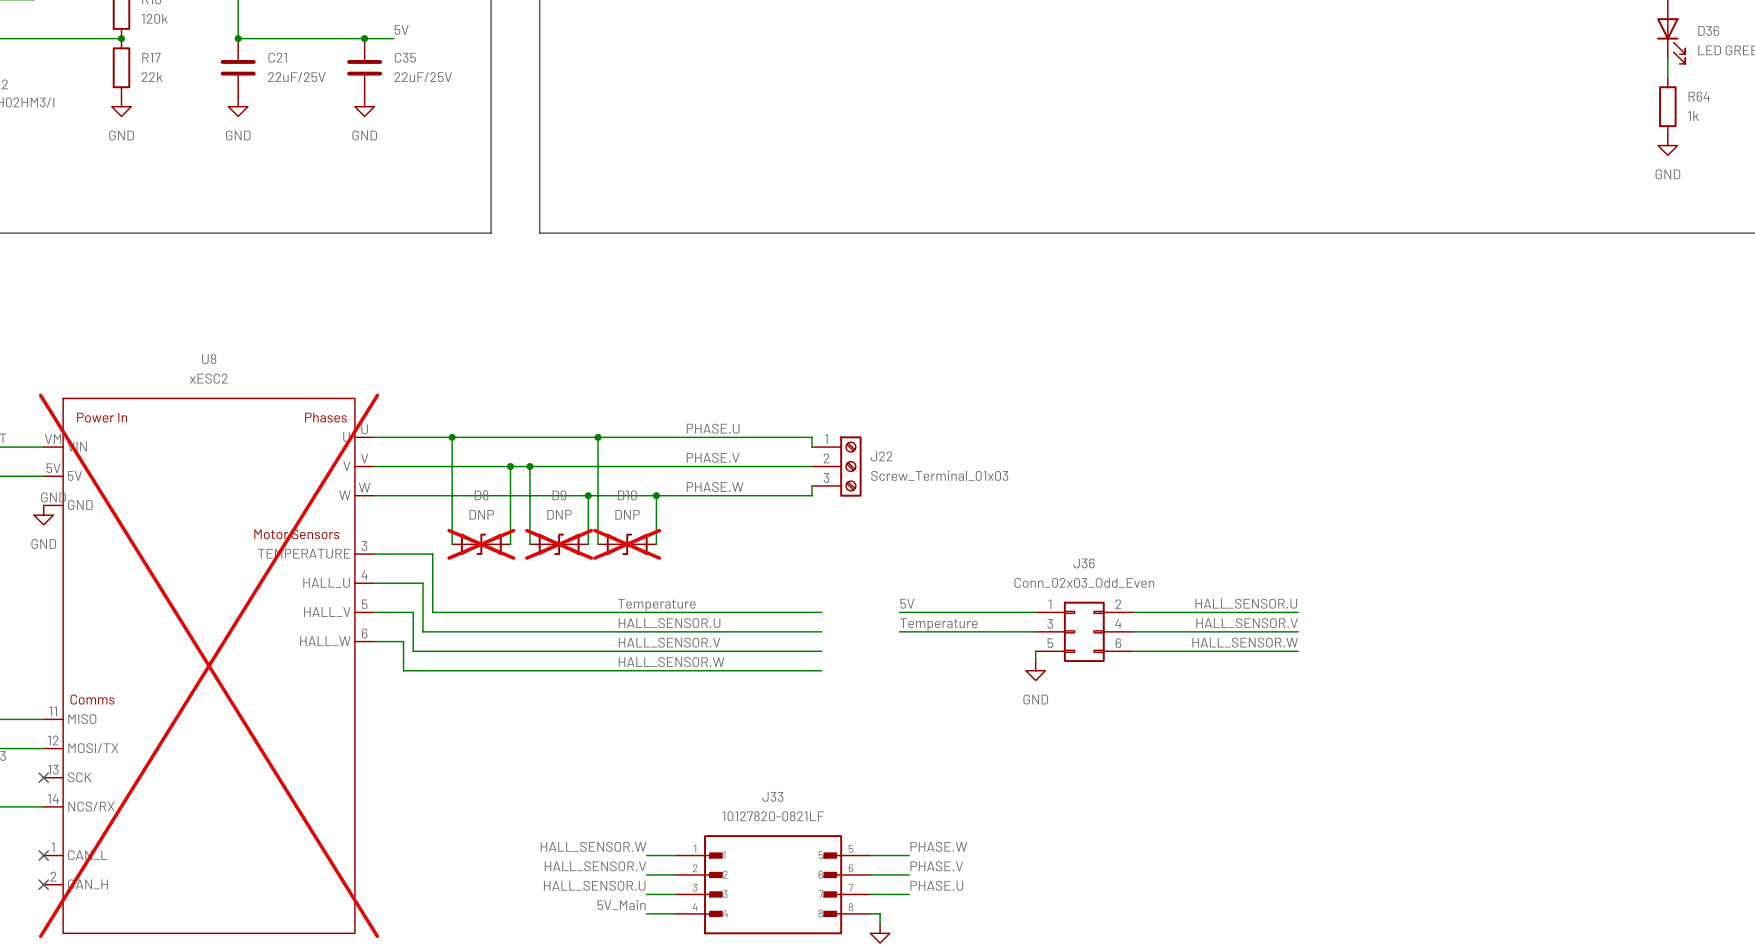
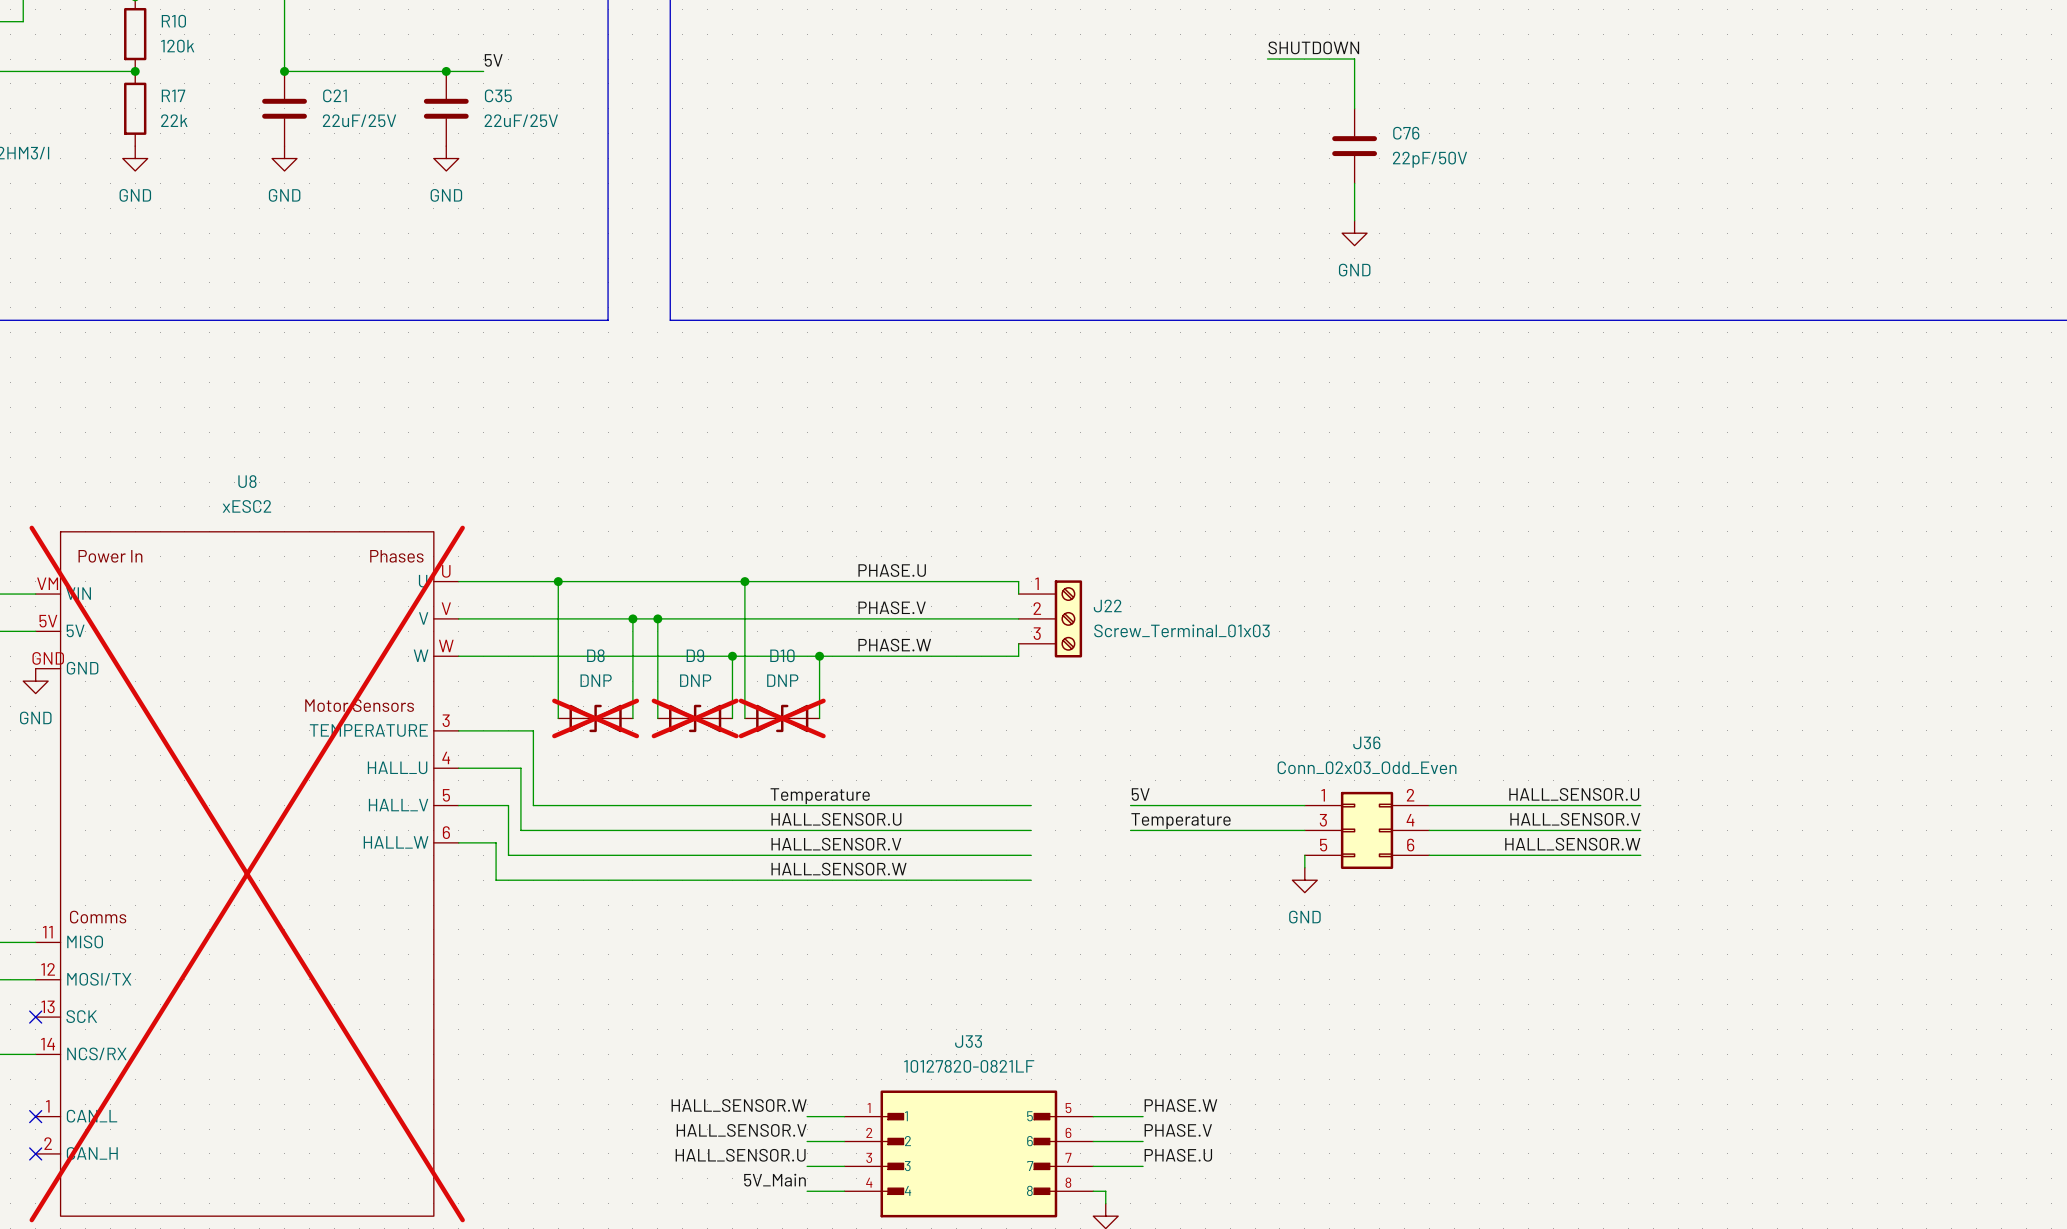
label: none -> SHUTDOWN (1313, 47)
wire: none -> (1267, 59) (1354, 59) (1354, 108)
C76: none -> 22pF/50V (1354, 146)
wire: none -> (1354, 183) (1354, 220)
power symbol: none -> GND (1354, 233)

